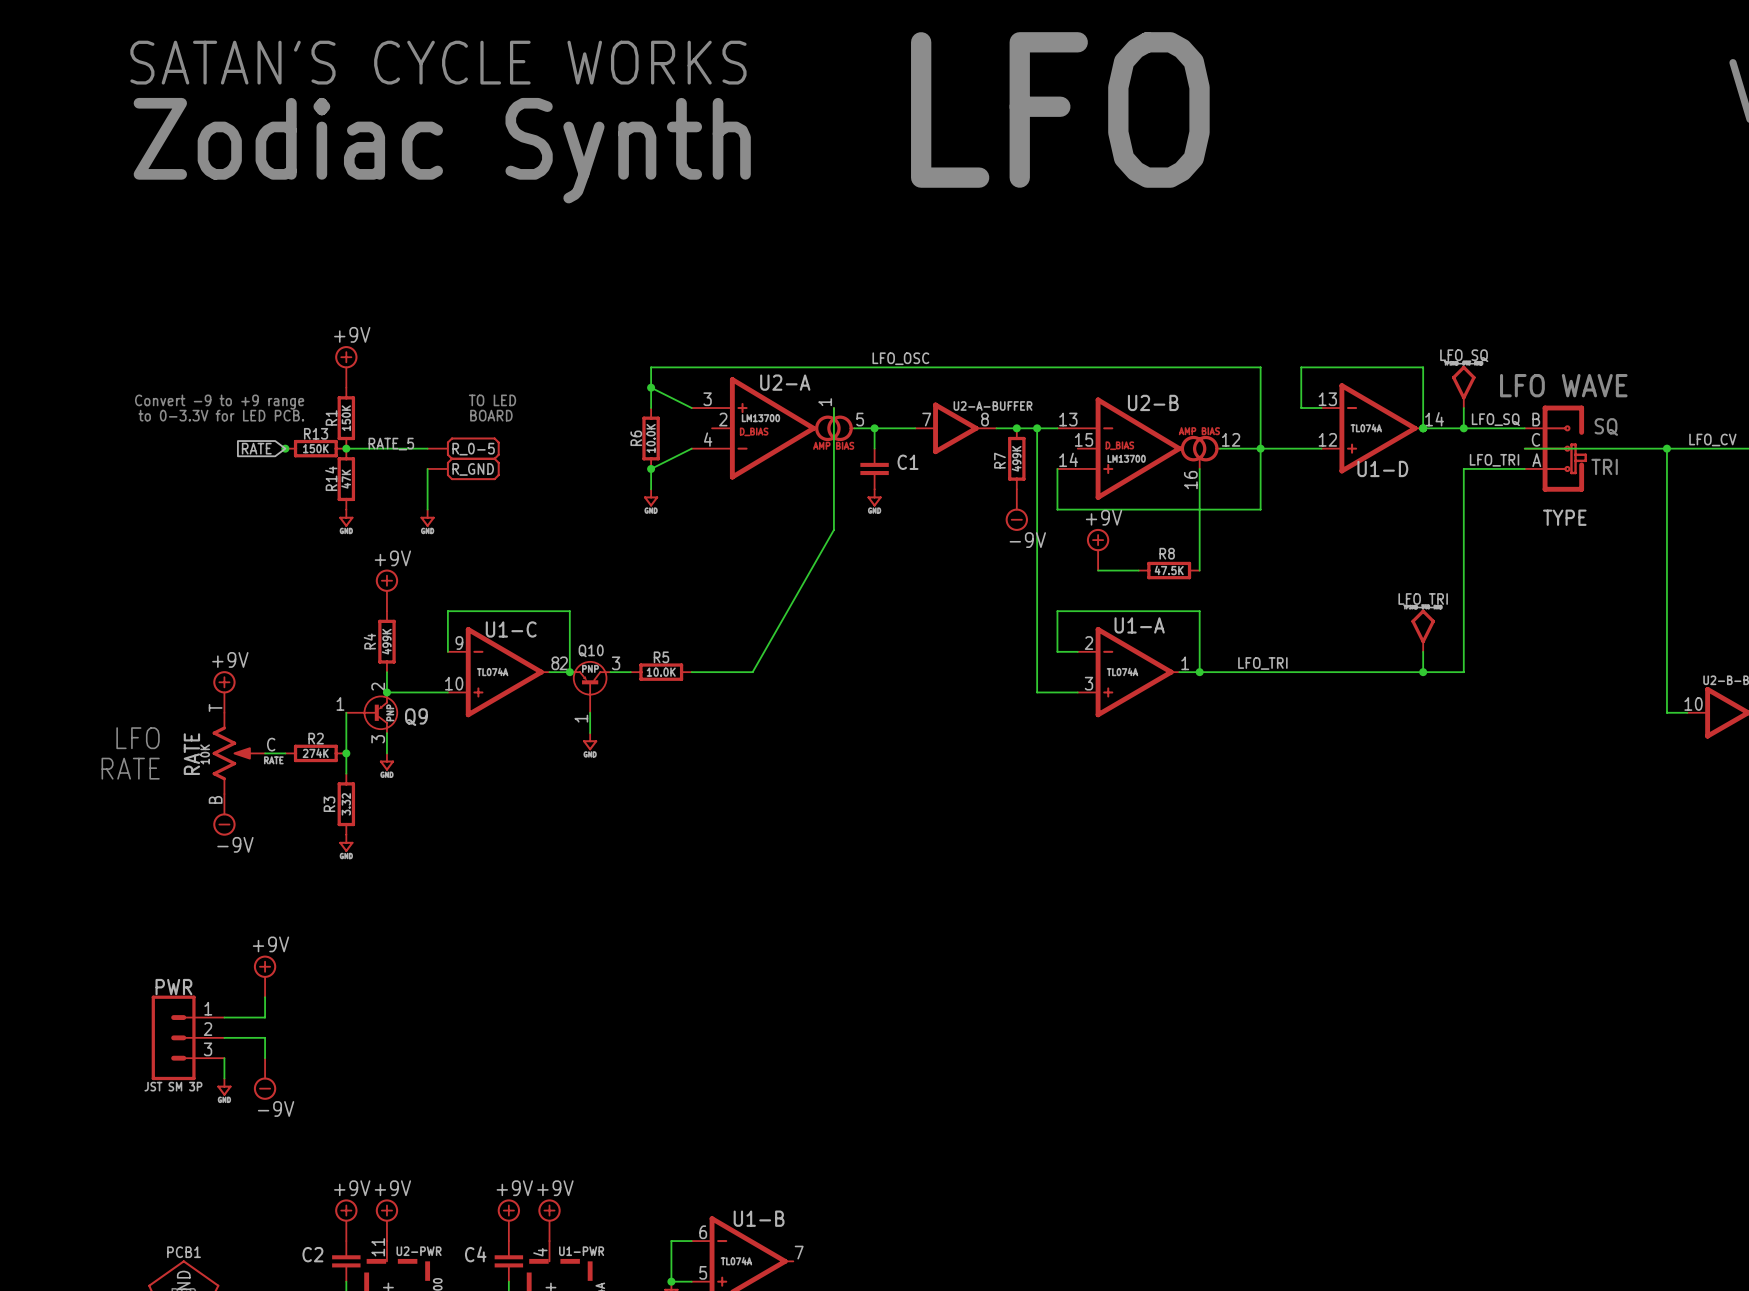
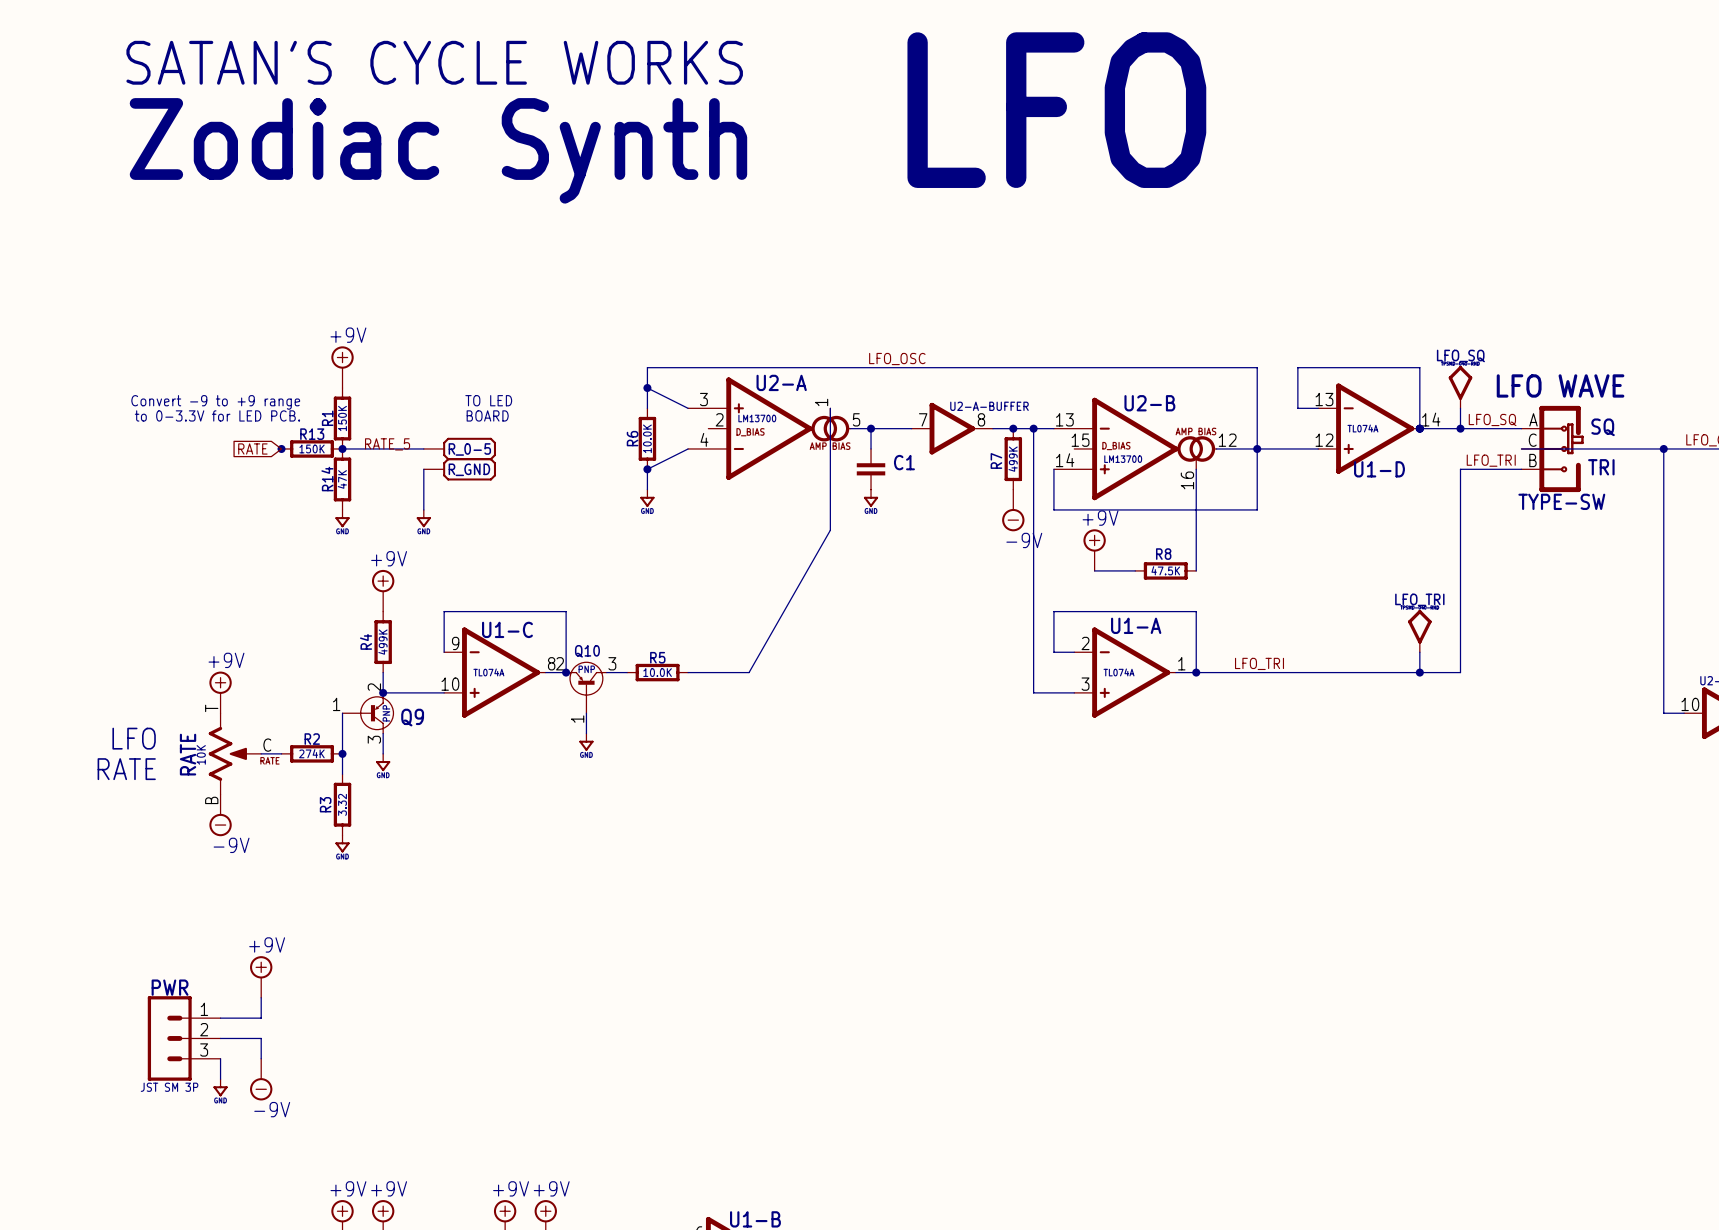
TYPE: (1555, 448) -> none
TYPE-SW: none -> (1552, 448)

